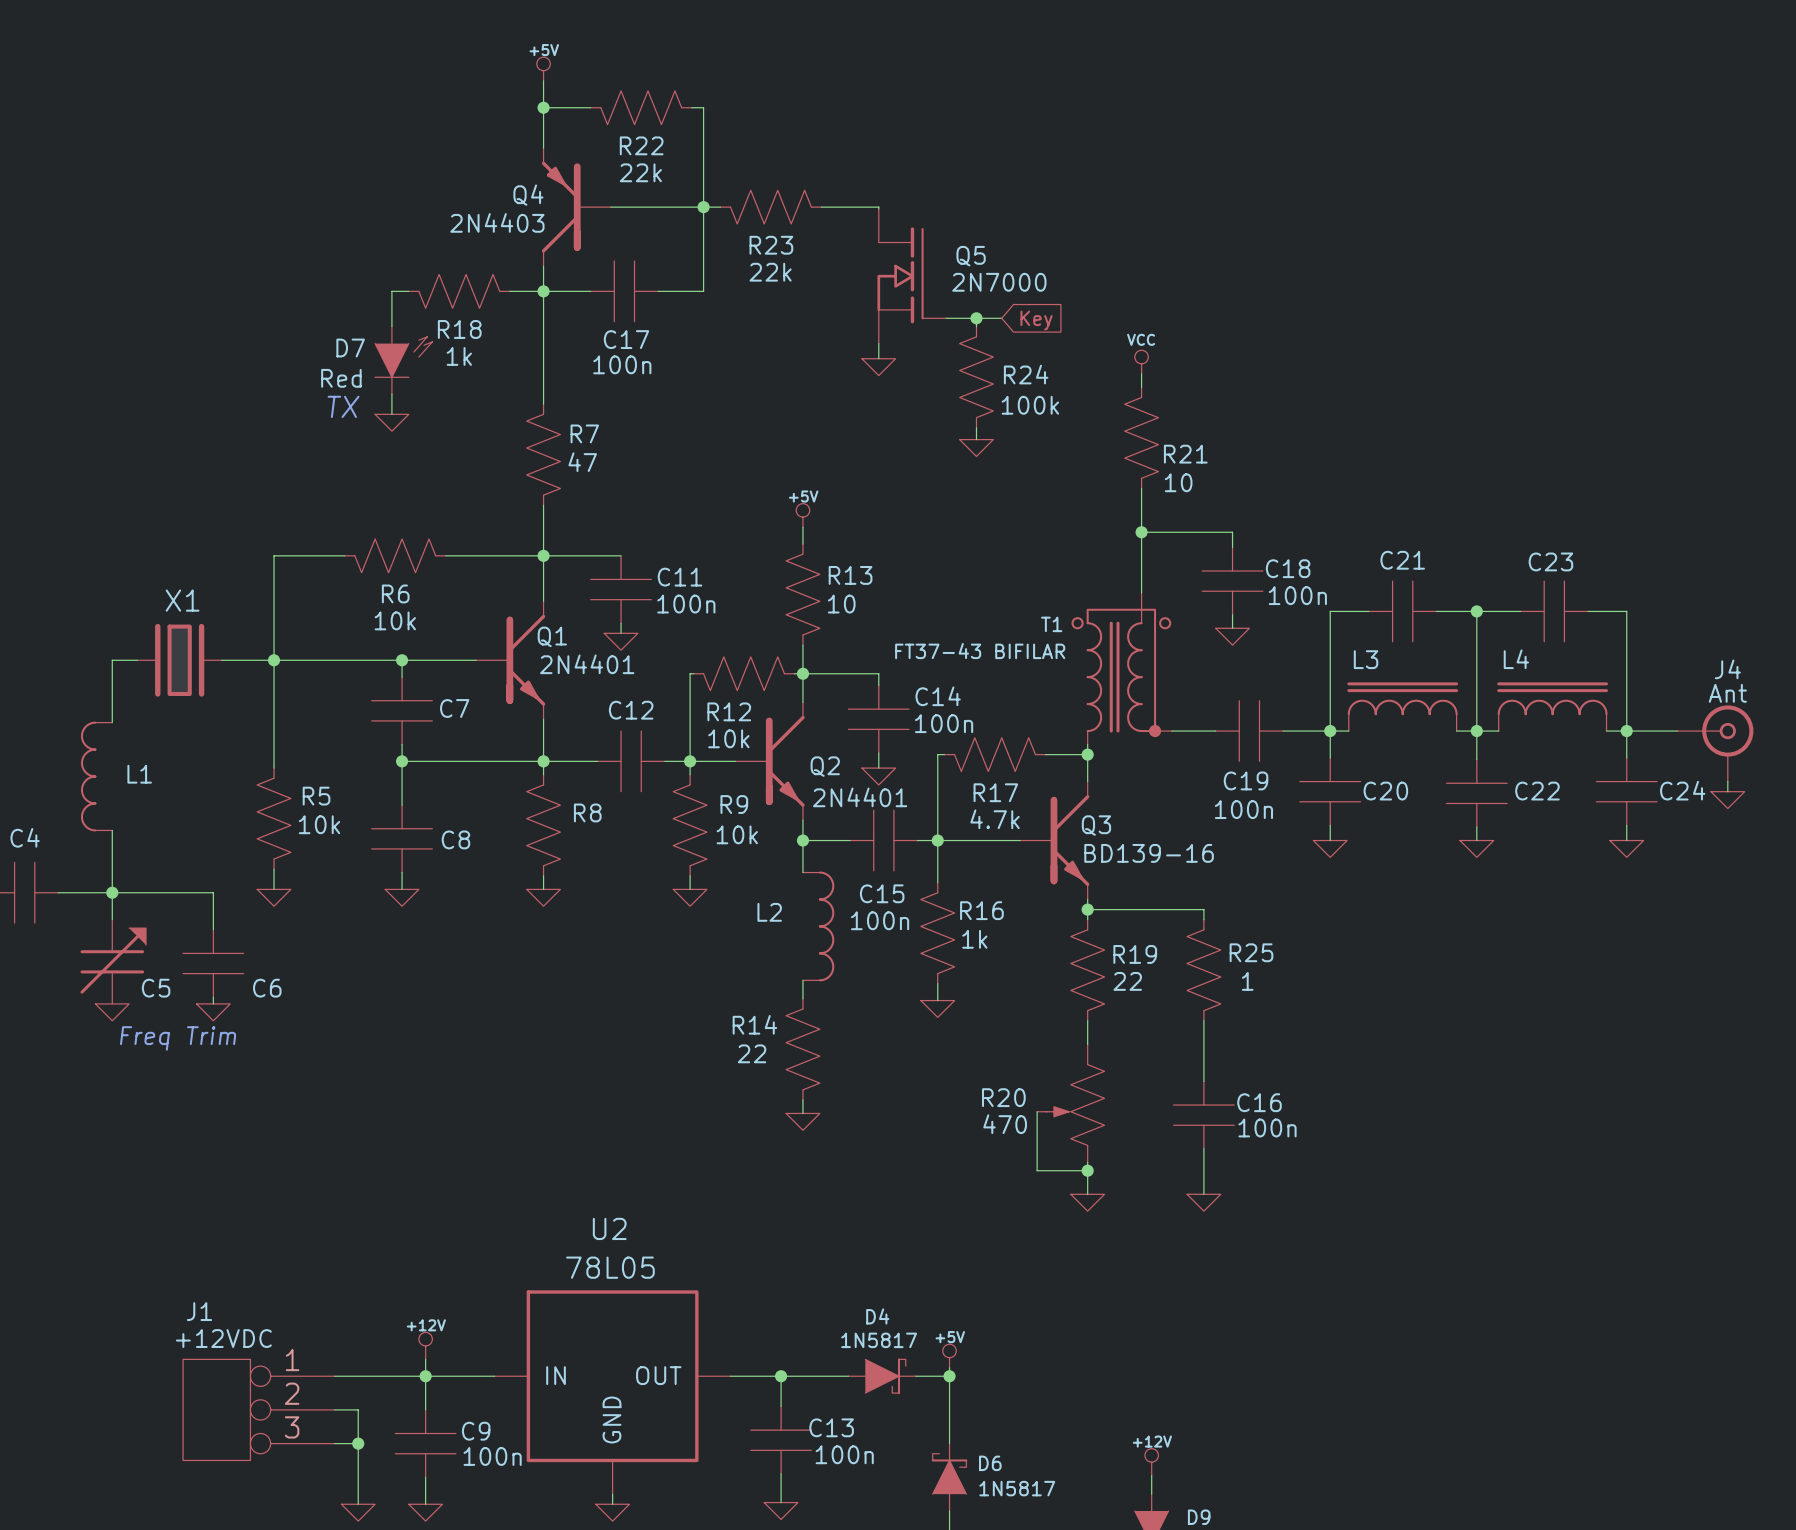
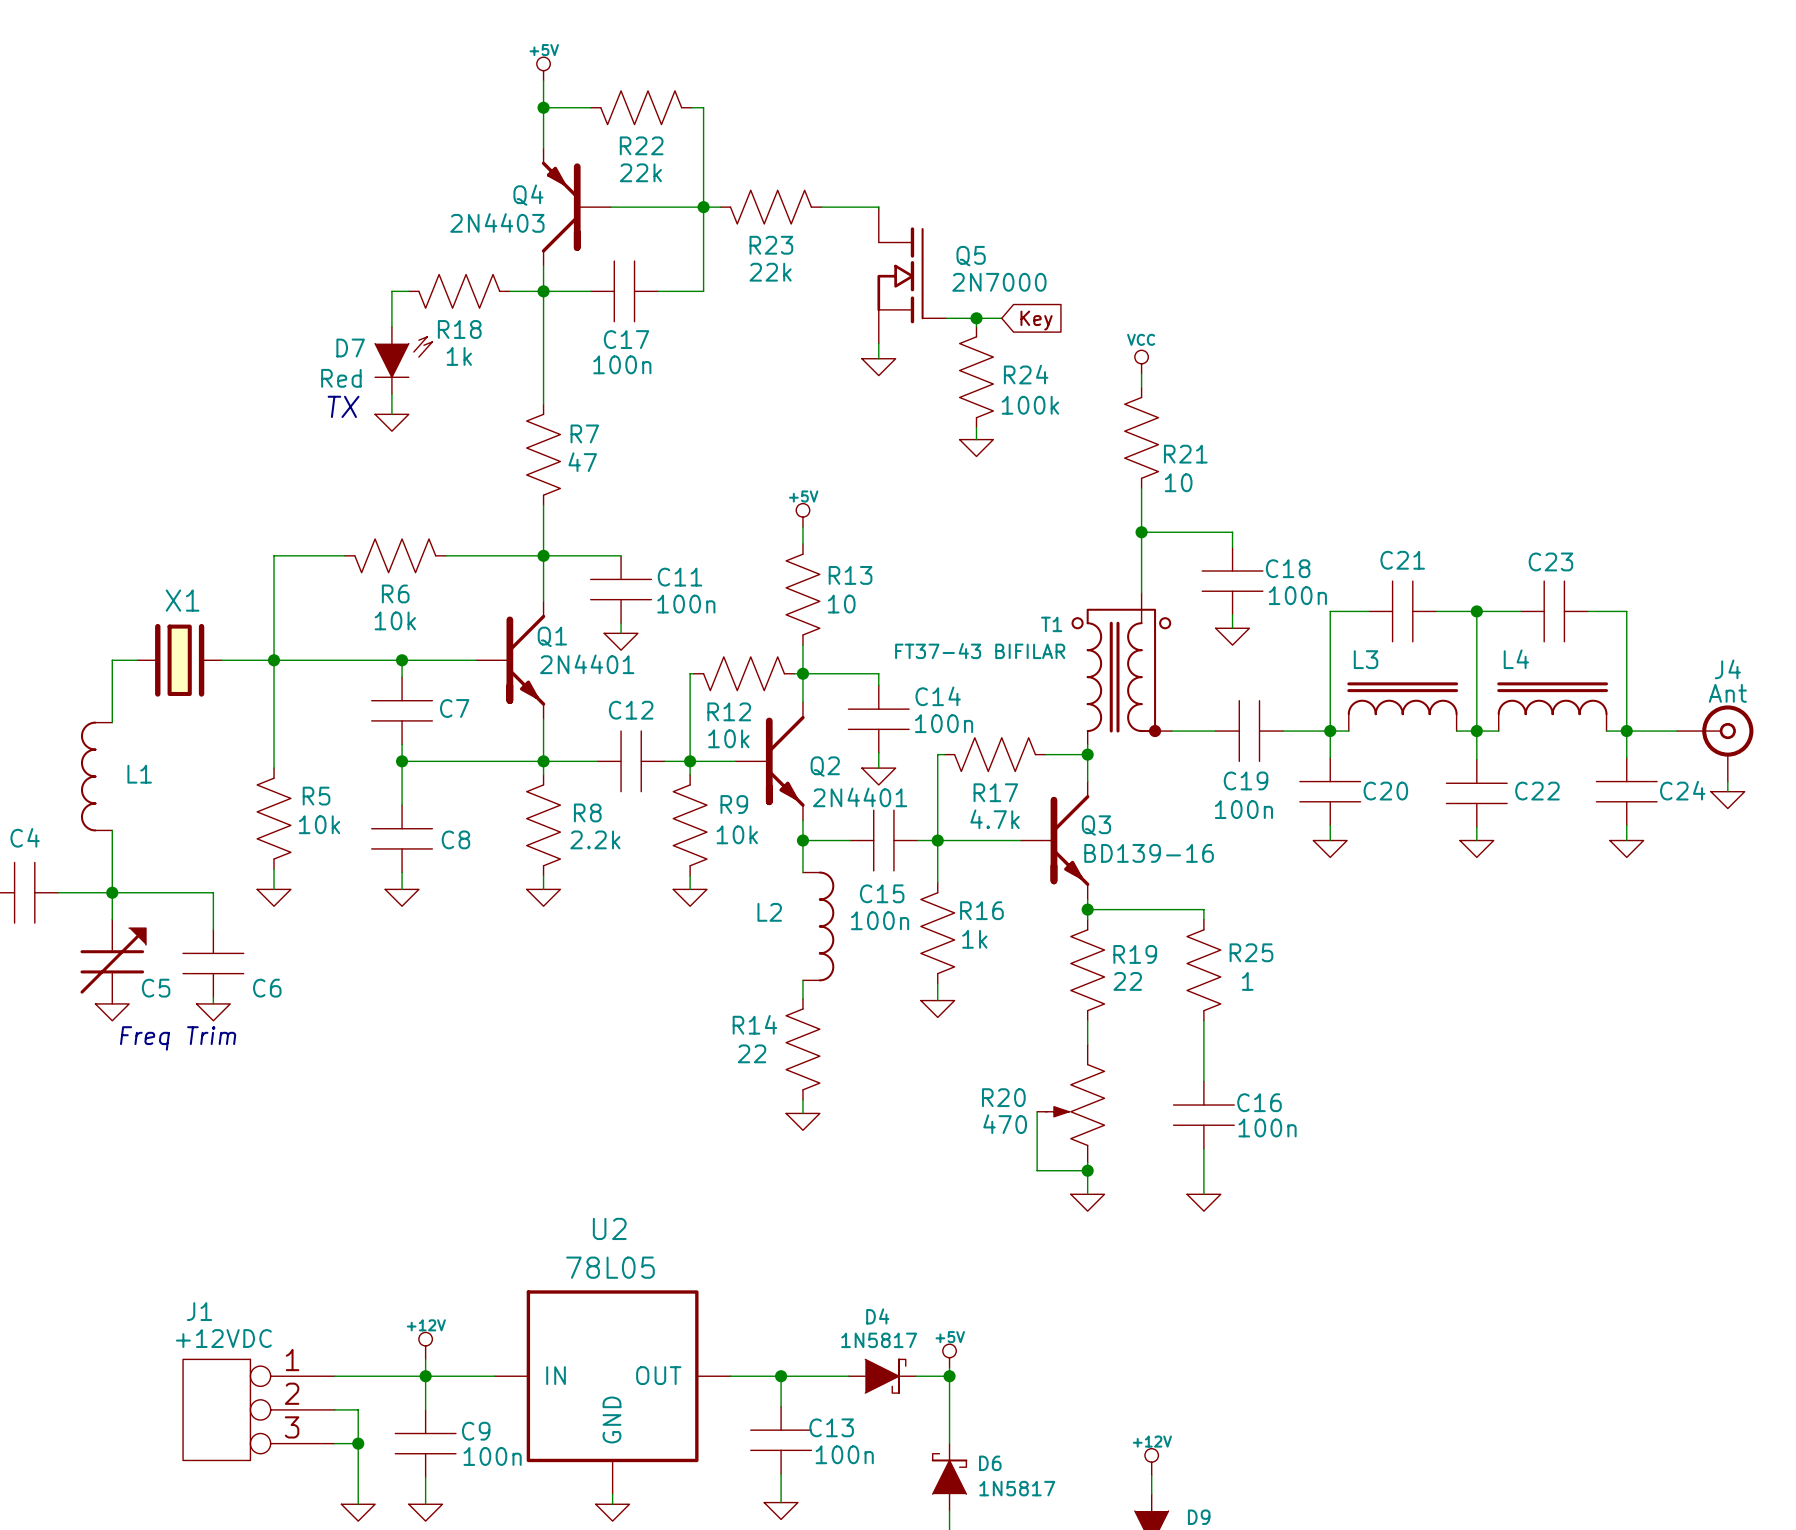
R8 value: none -> 2.2k (595, 839)

